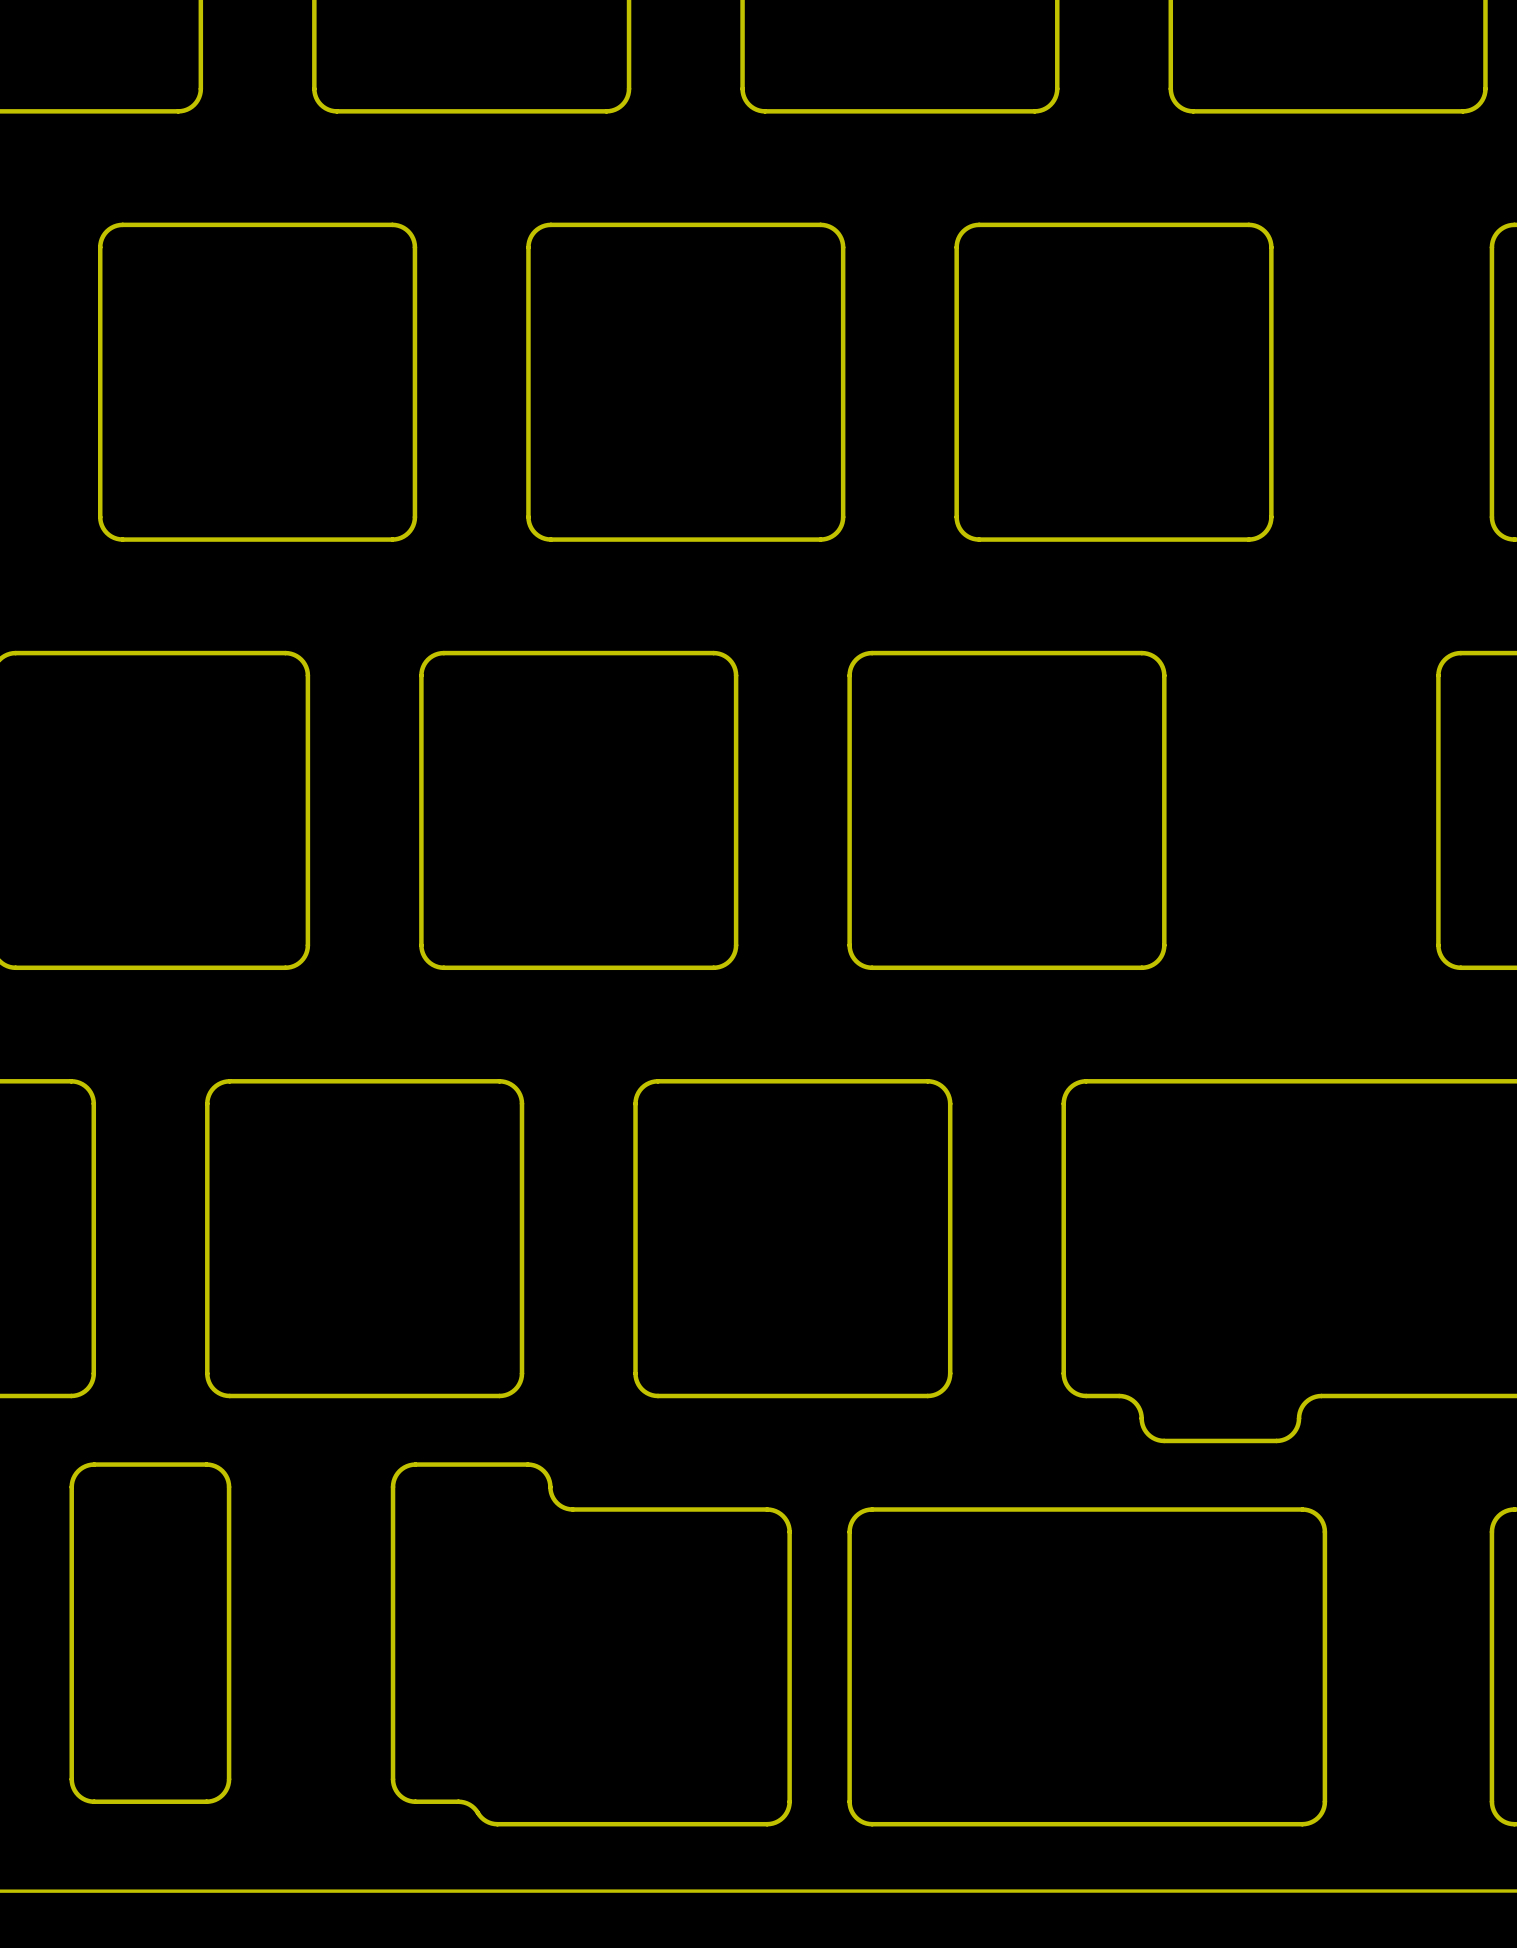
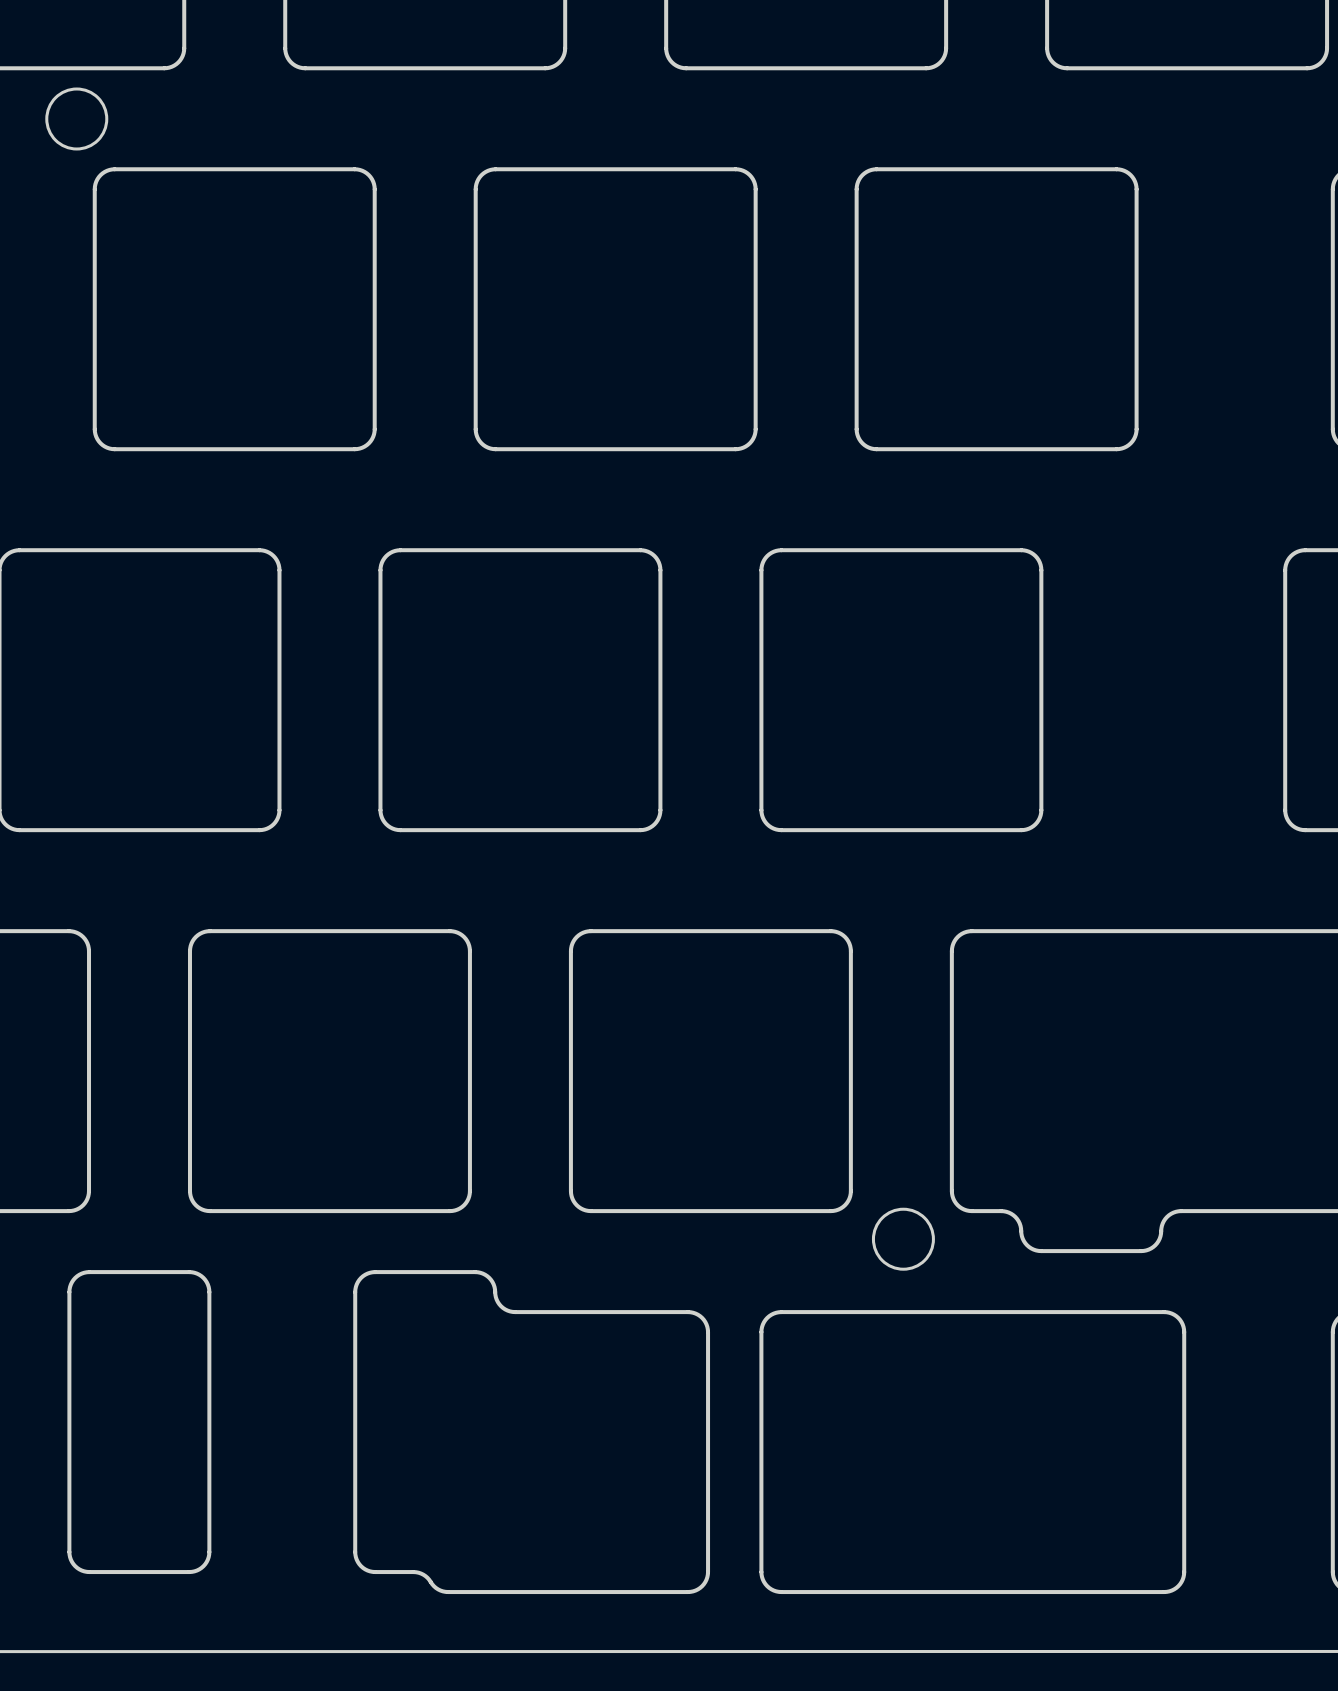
round board edge: none -> [45, 87, 109, 151]
round board edge: none -> [871, 1207, 935, 1271]

